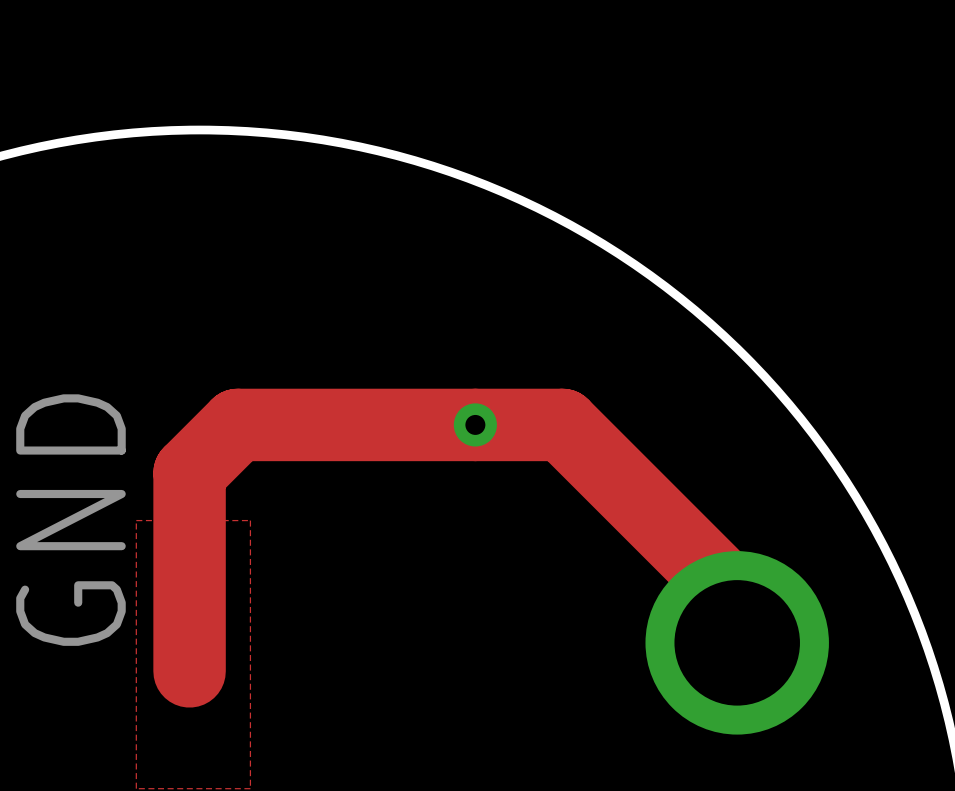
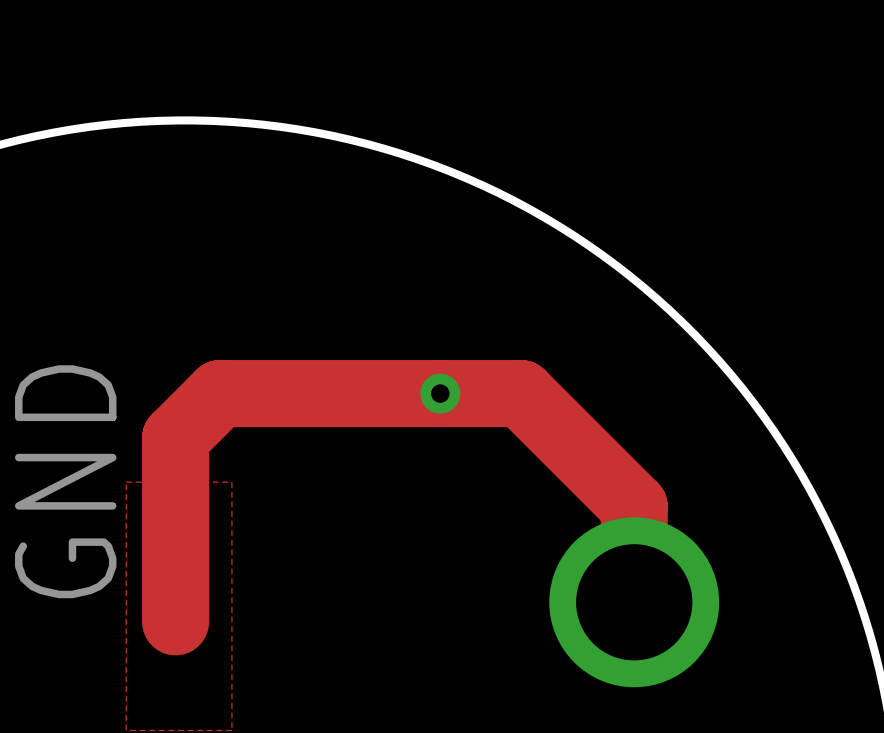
via position: (737, 642) -> (634, 602)

